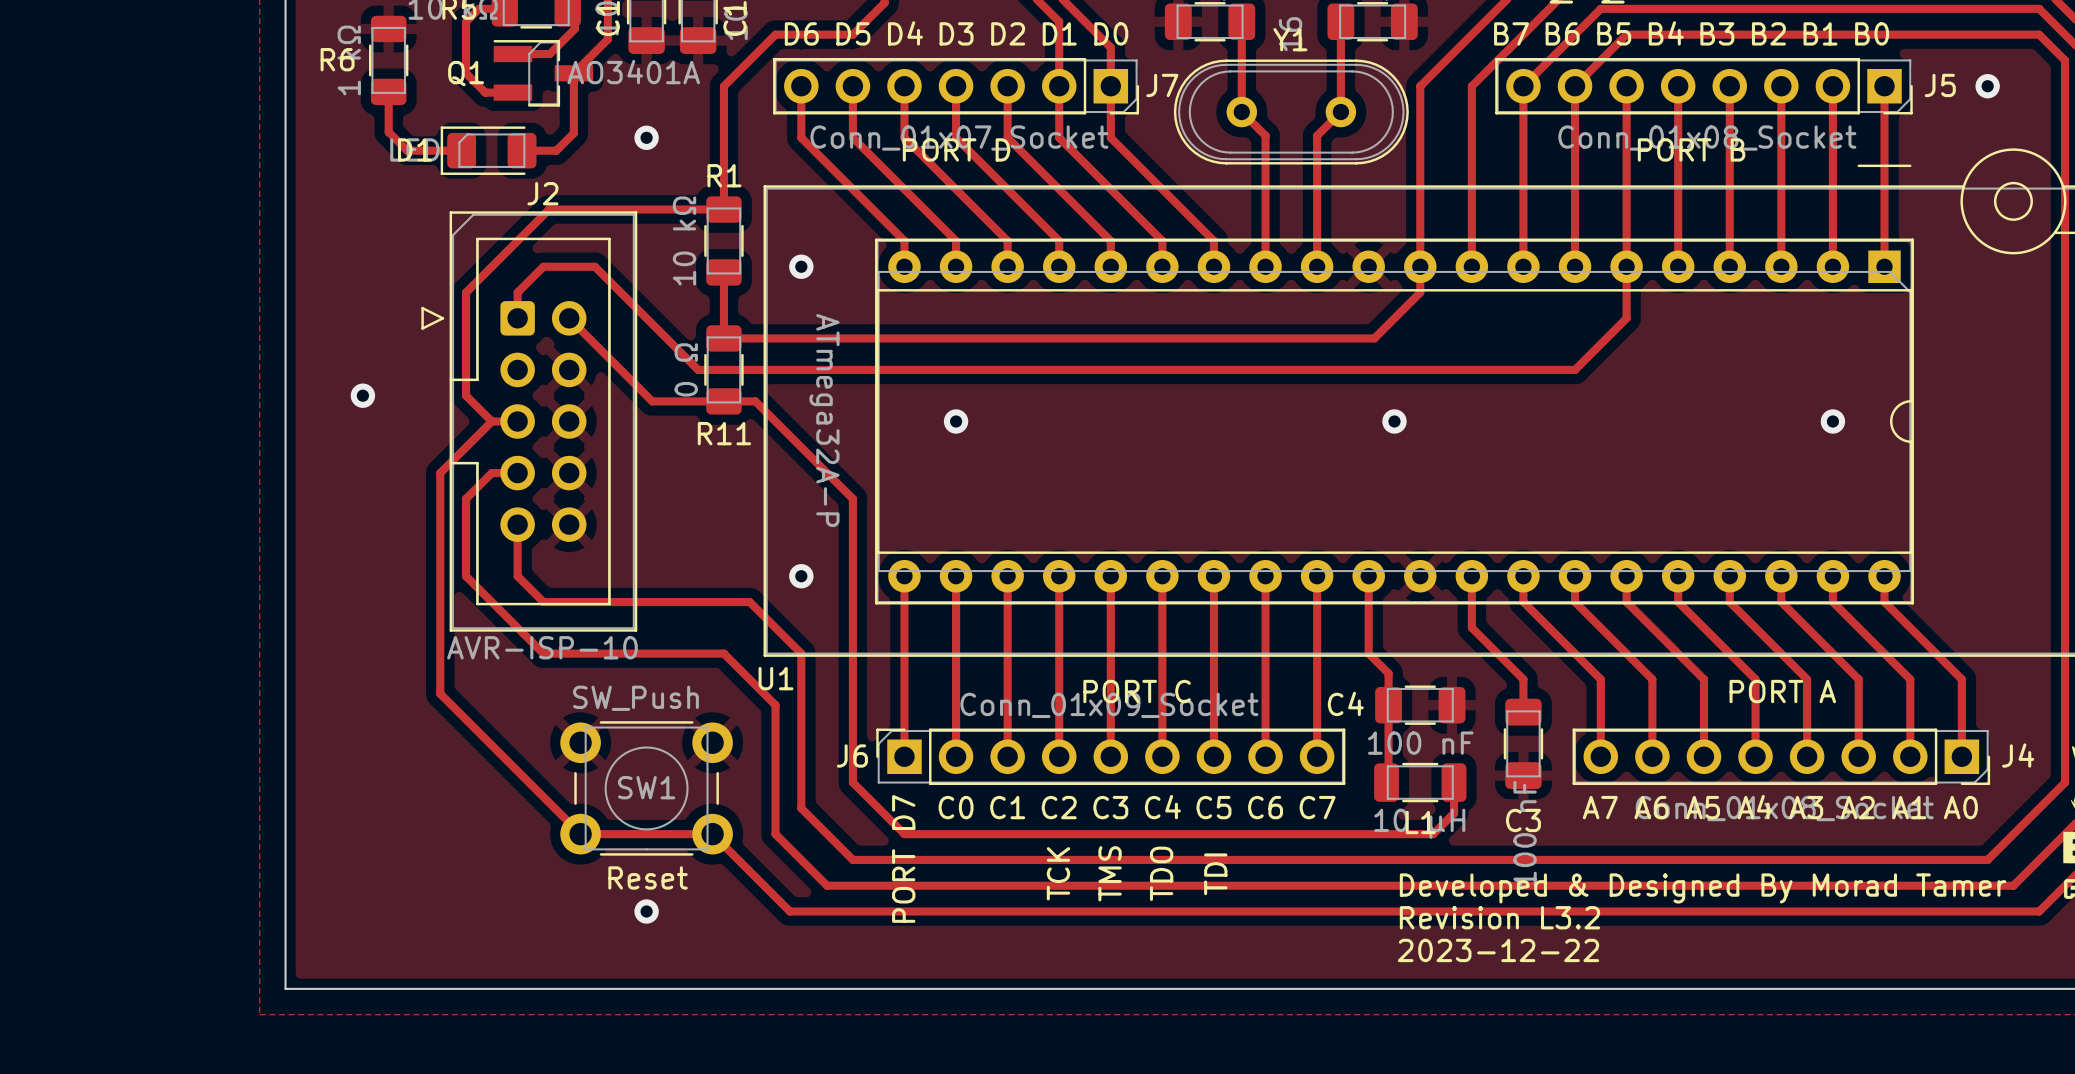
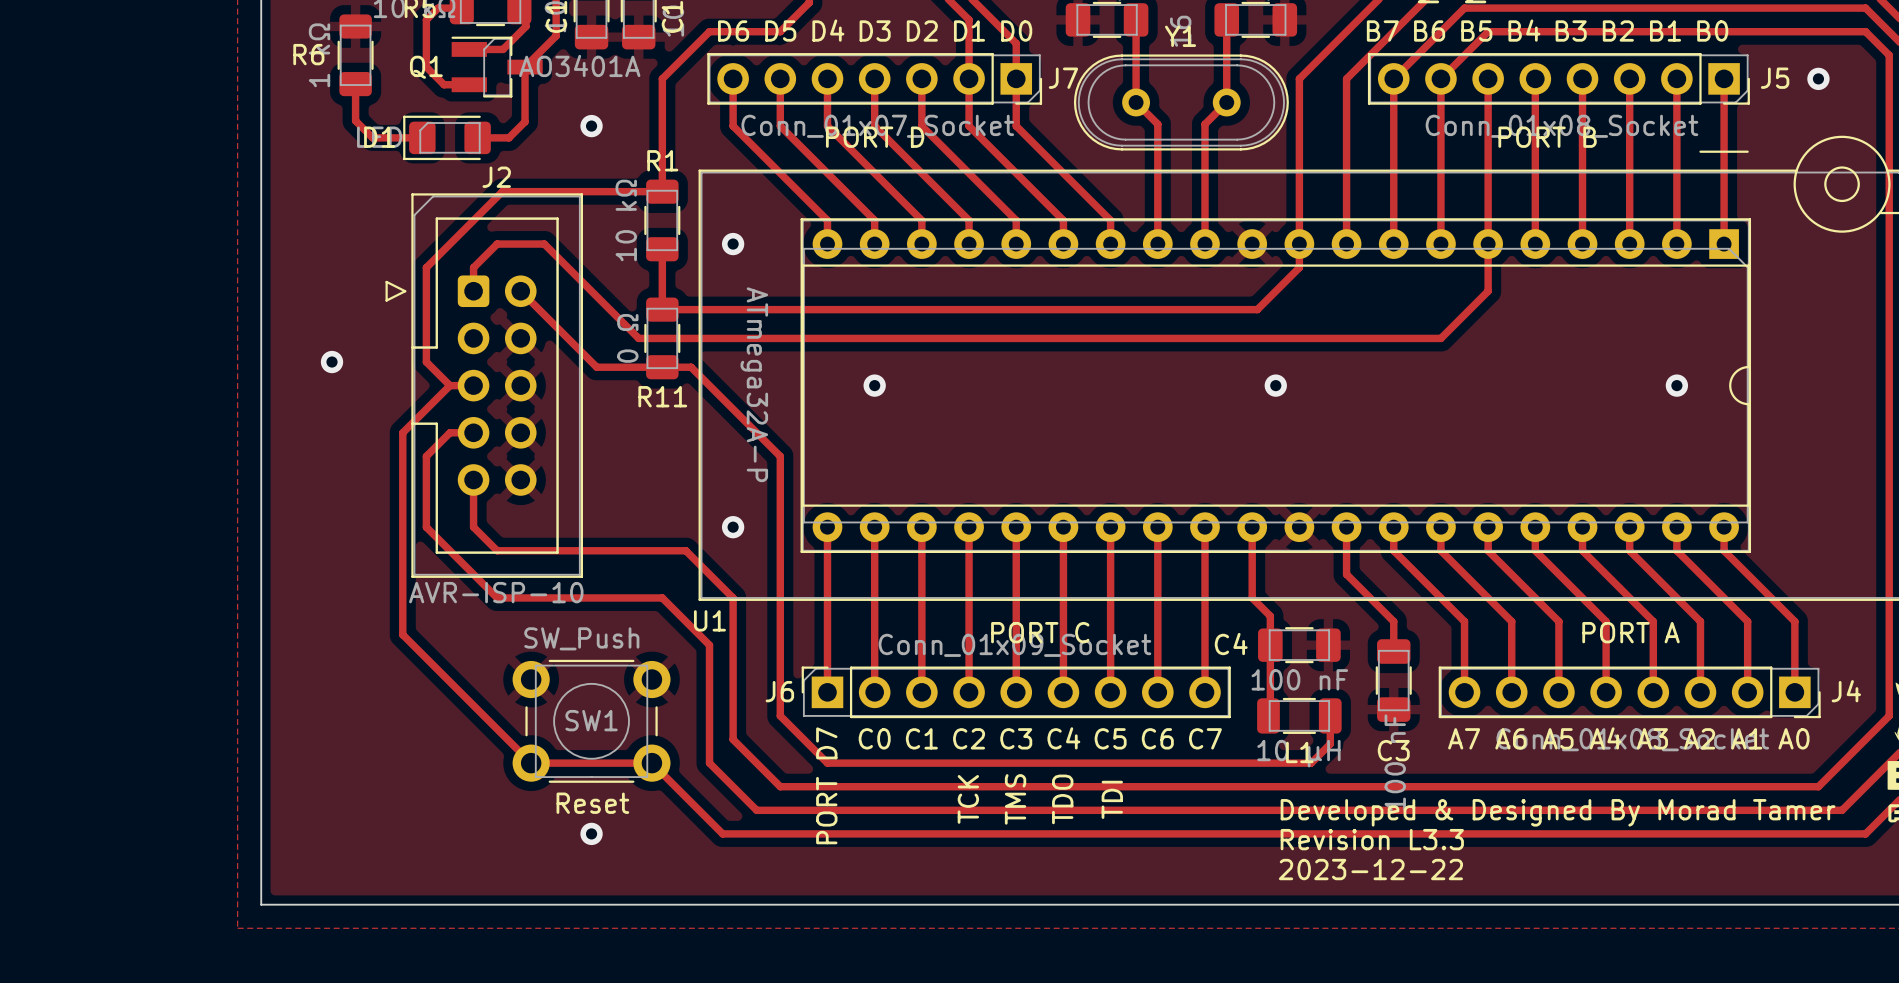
text: Revision L3.2 (1499, 917) -> Revision L3.3 (1372, 839)

